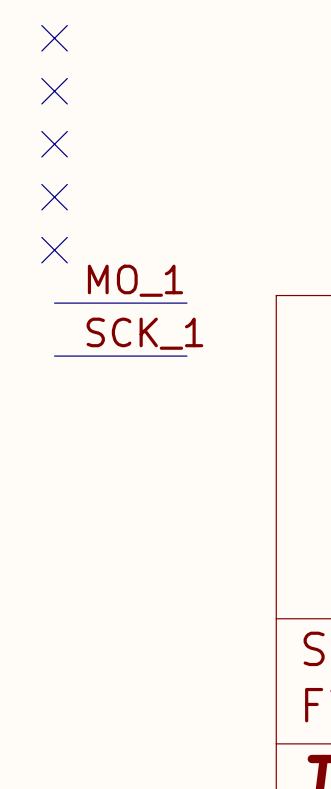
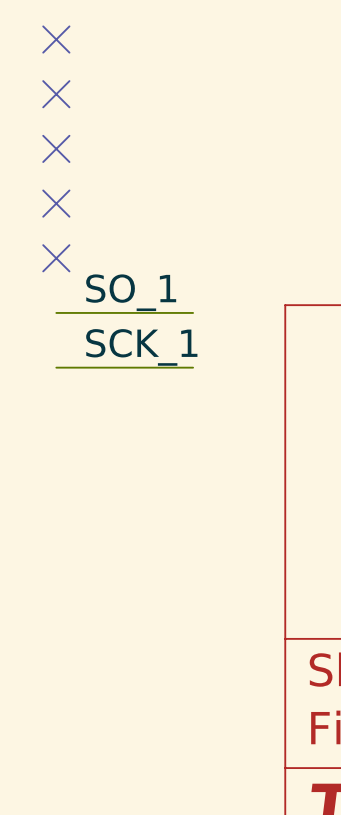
label: MO_1 (135, 280) -> SO_1 (131, 292)

